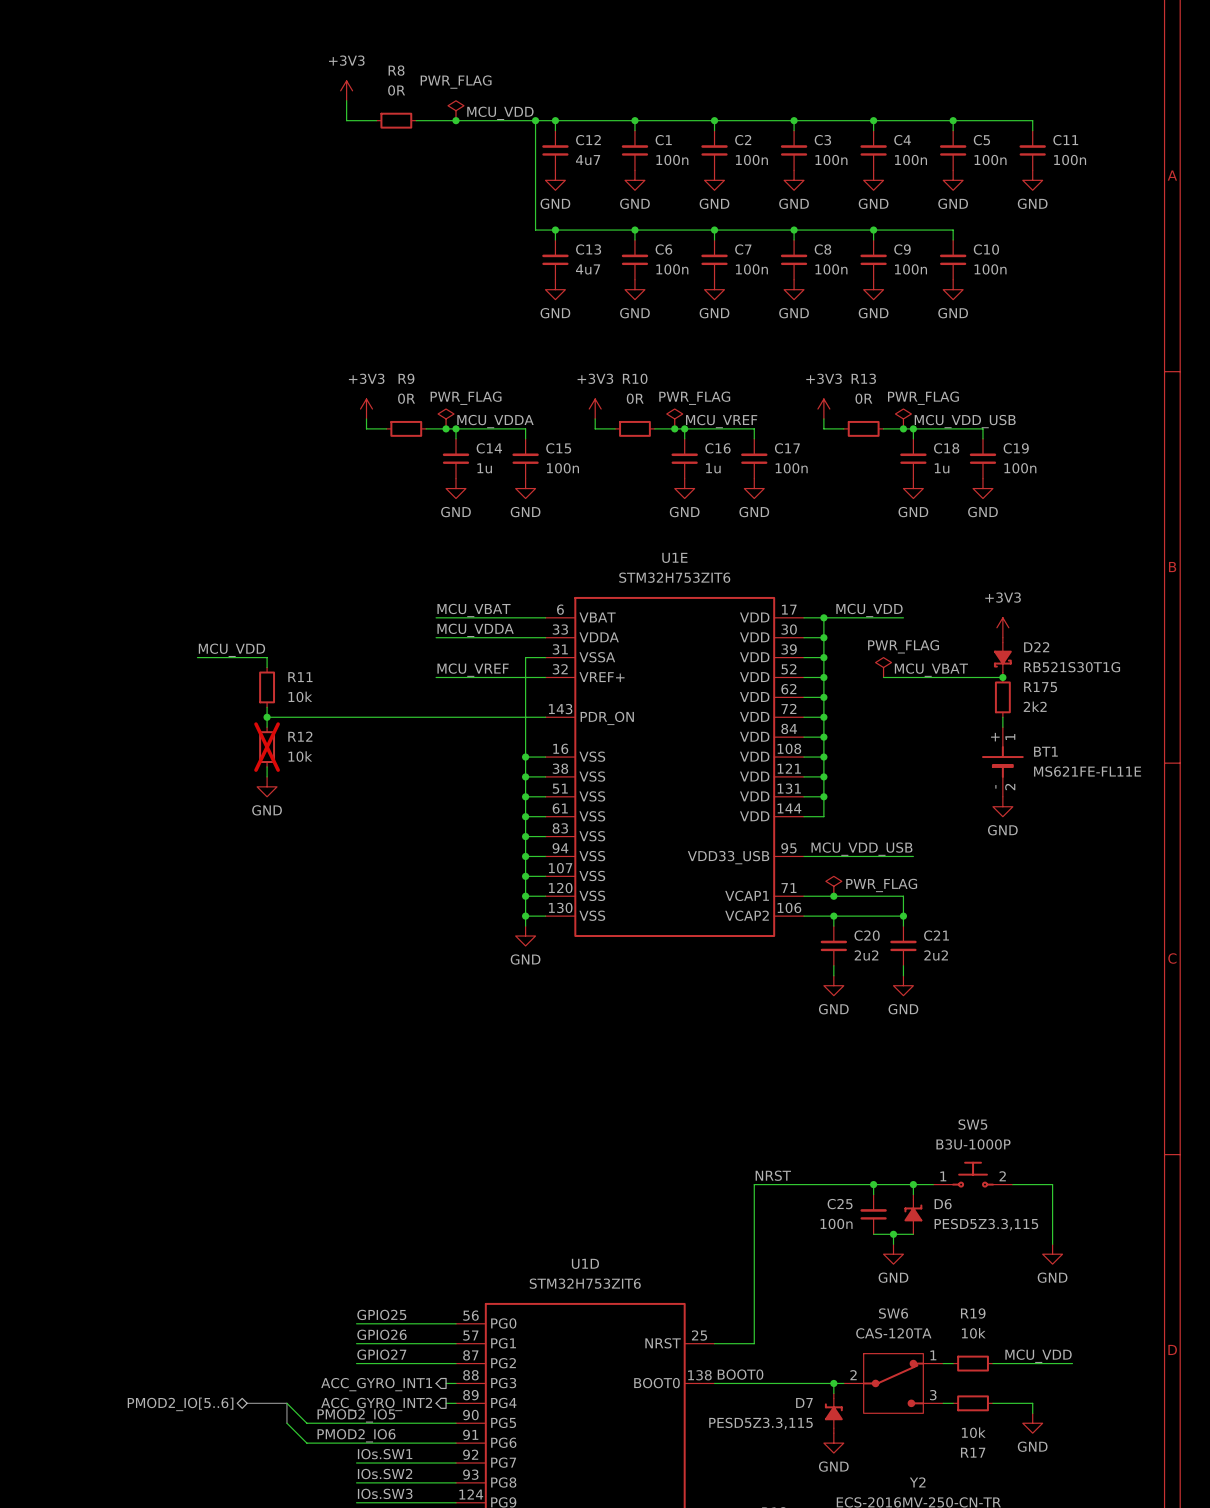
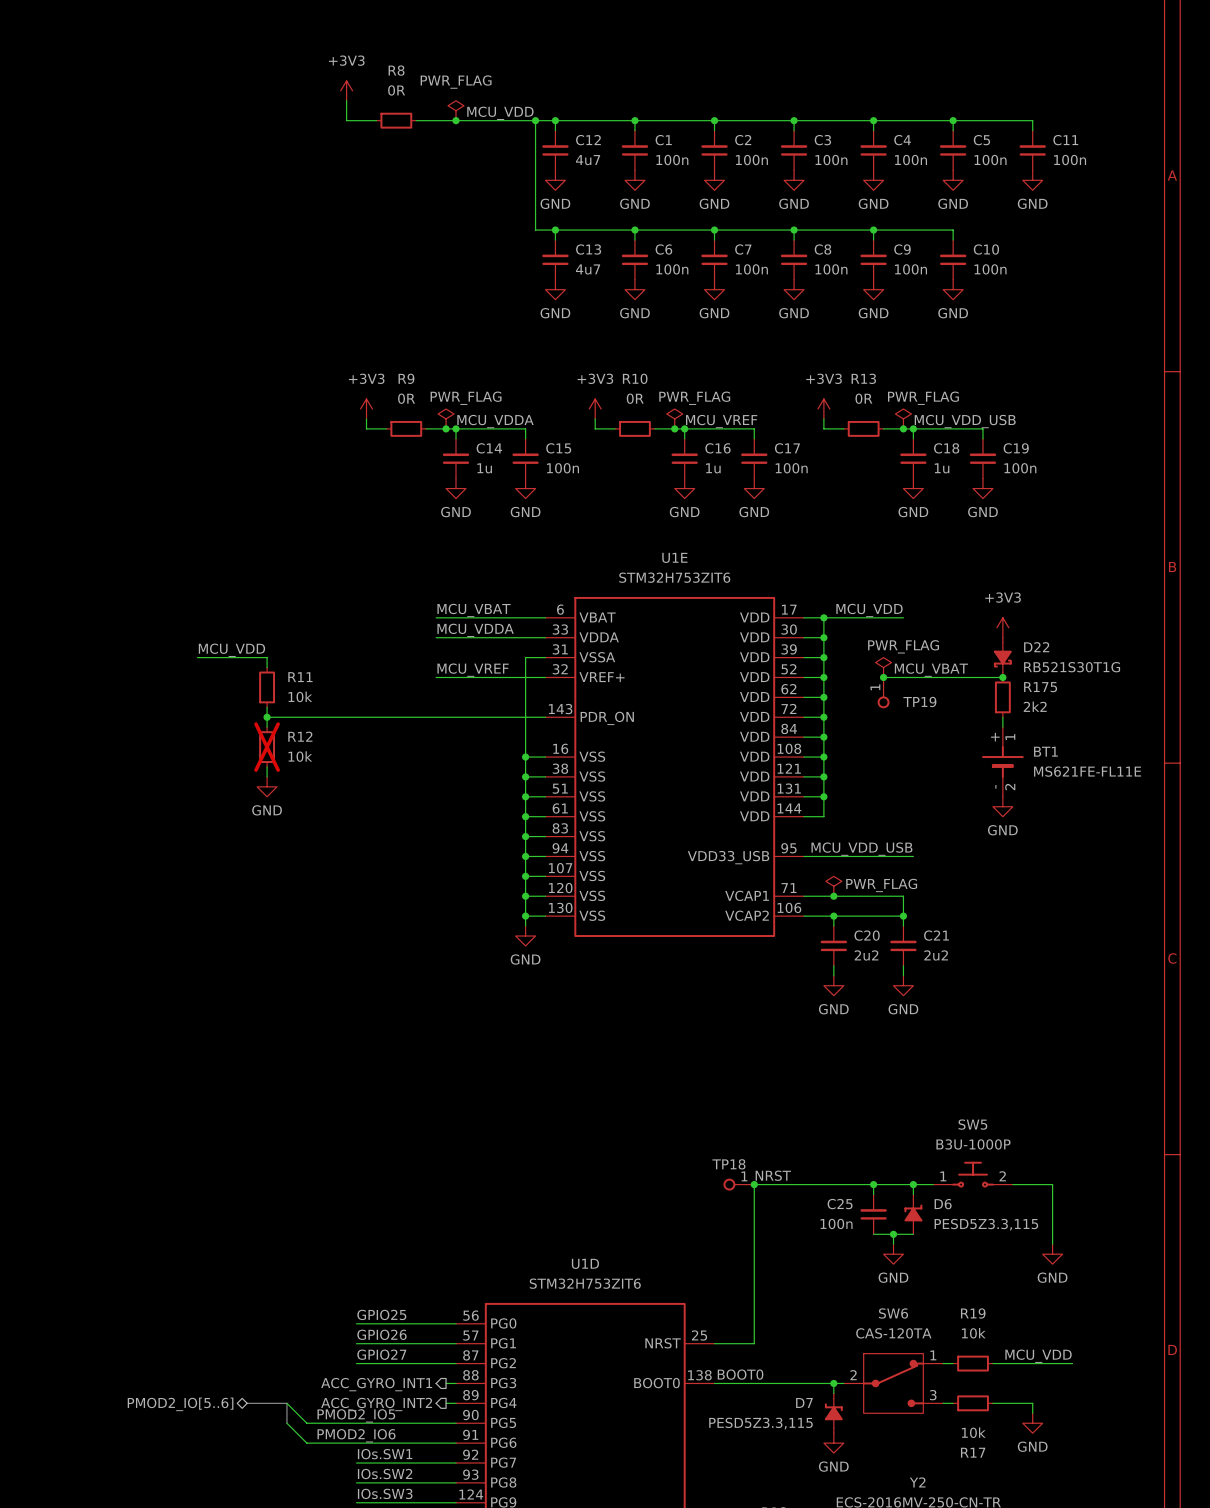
junction: none -> (883, 677)
TP19: none -> (883, 692)
TP18: none -> (738, 1184)
junction: none -> (754, 1184)

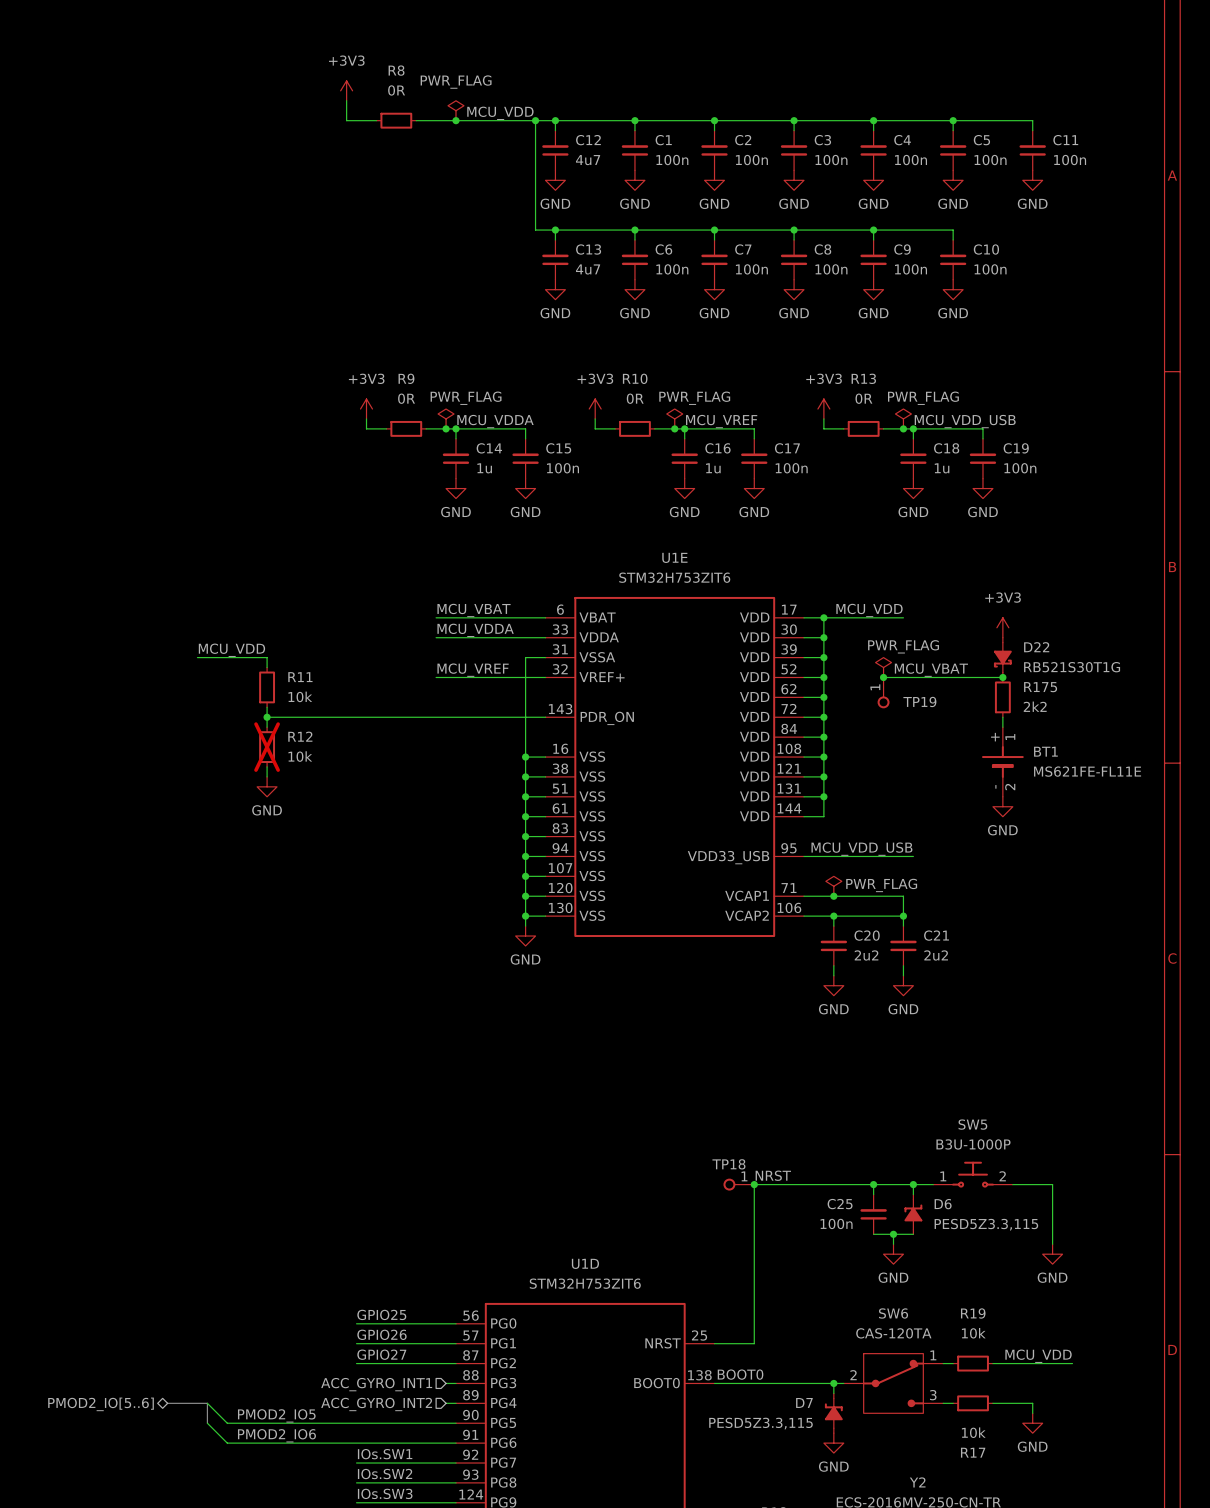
hierarchical label shape: output (376, 1384) -> input (376, 1384)
bus: (247, 1403) (286, 1403) (286, 1423) -> (167, 1403) (207, 1403) (207, 1423)
wire: (286, 1403) (306, 1423) -> (207, 1403) (227, 1423) (306, 1423)
hierarchical label position: PMOD2_IO[5..6] (180, 1404) -> PMOD2_IO[5..6] (101, 1404)
hierarchical label shape: output (376, 1404) -> input (376, 1404)
label position: PMOD2_IO5 (356, 1415) -> PMOD2_IO5 (276, 1415)
wire: (286, 1423) (306, 1443) -> (207, 1423) (227, 1443) (306, 1443)
label position: PMOD2_IO6 (356, 1435) -> PMOD2_IO6 (276, 1435)

